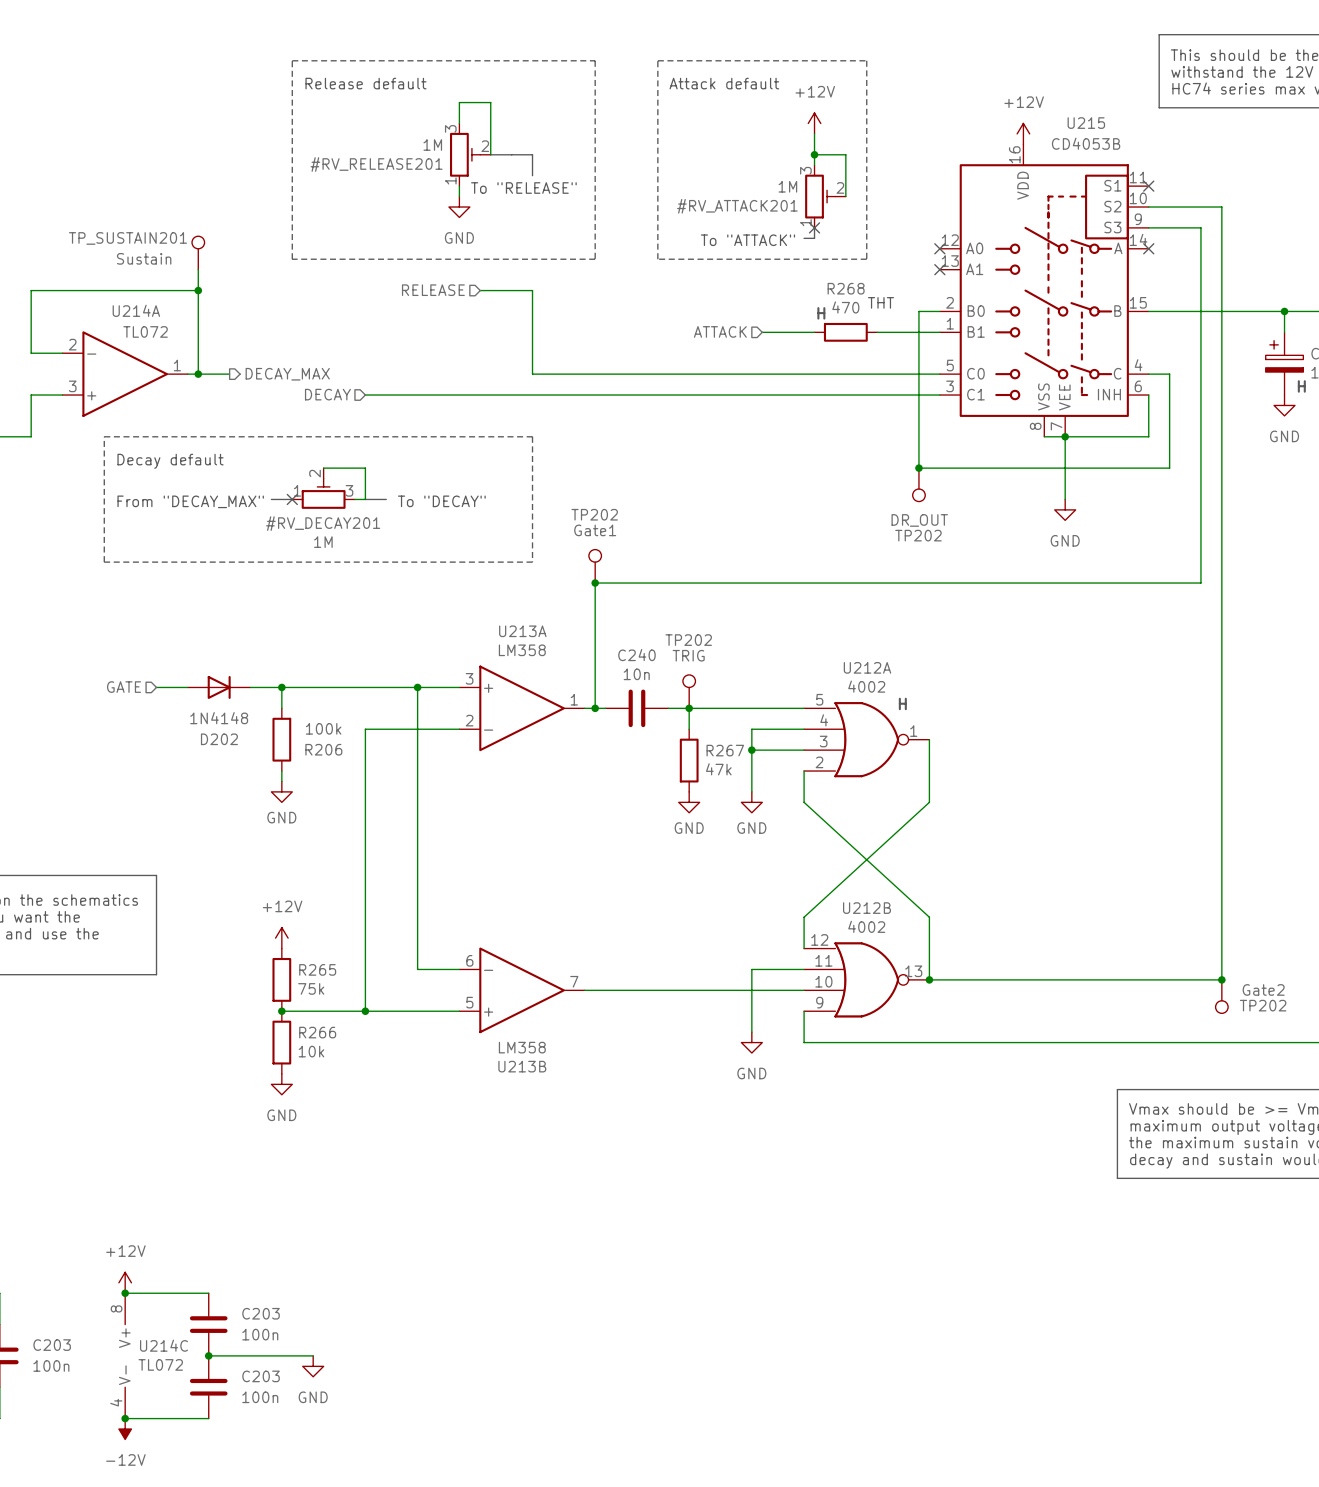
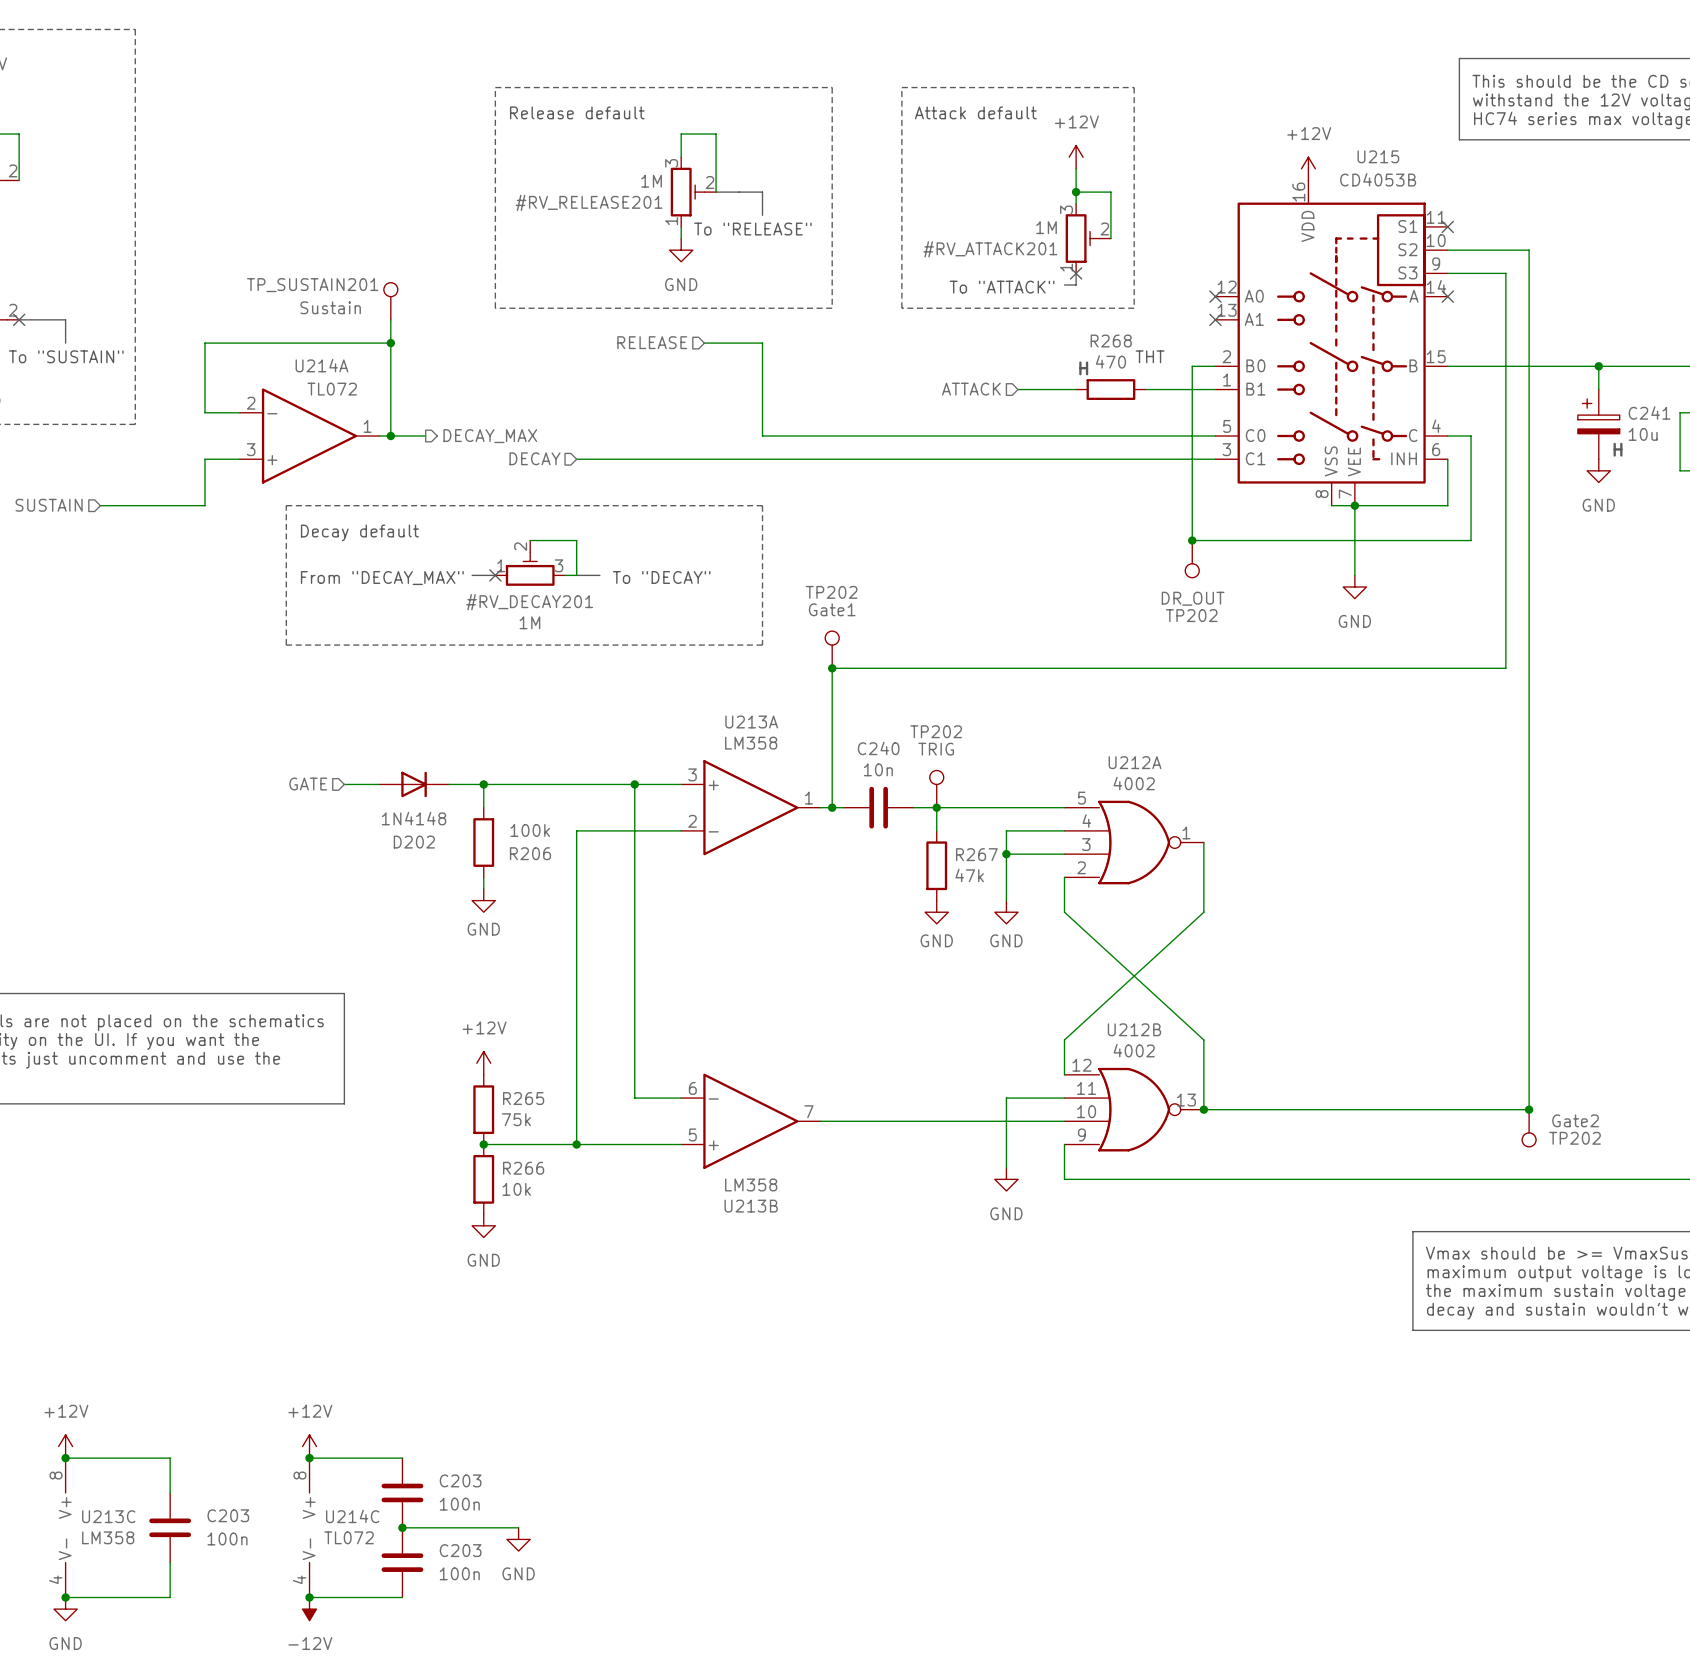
text: H (902, 703) -> none

